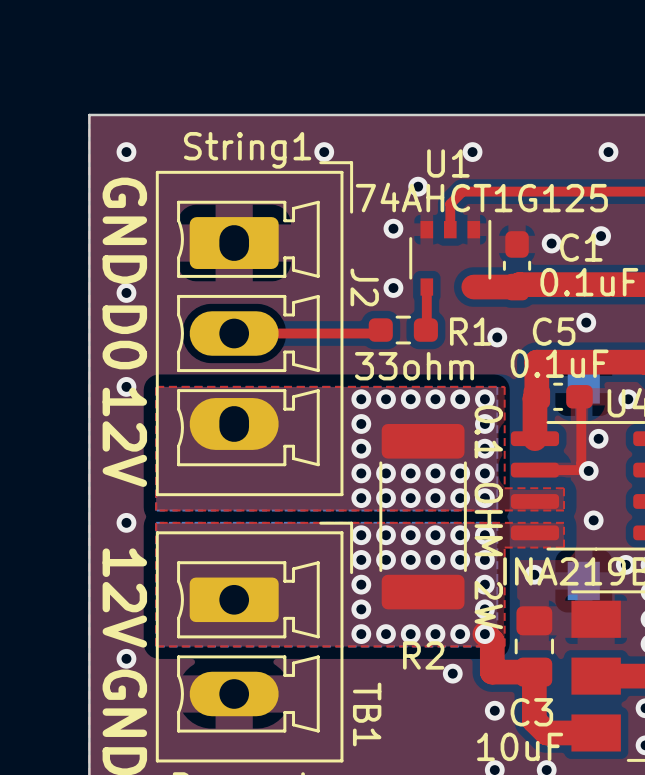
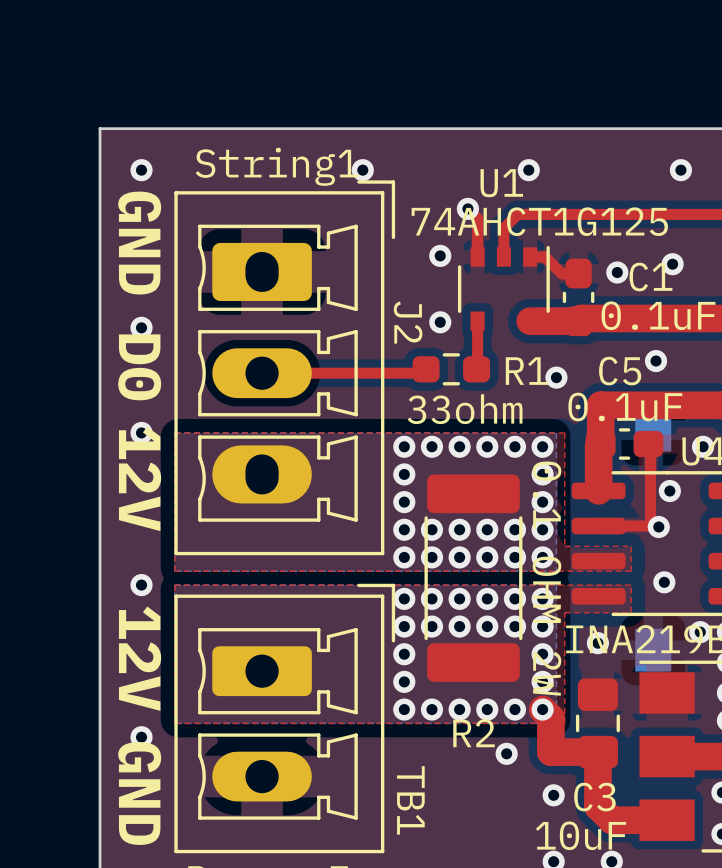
top track: none -> (467, 208) (477, 218) (477, 257)
top track: none -> (530, 257) (545, 257) (561, 273) (578, 273)

